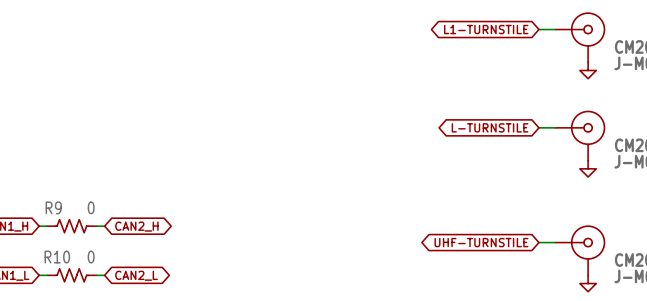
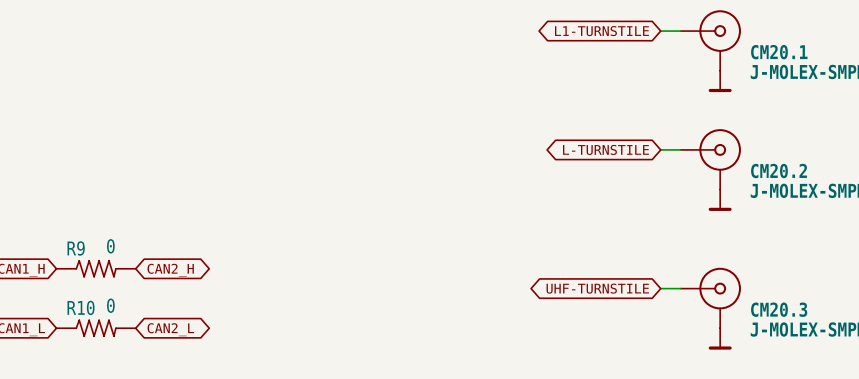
power symbol shape: [579, 62, 597, 79] -> [708, 70, 732, 93]
power symbol shape: [579, 160, 597, 178] -> [708, 189, 732, 211]
R9 symbol: [47, 219, 97, 233] -> [56, 260, 136, 278]
R10 symbol: [47, 268, 97, 282] -> [56, 319, 136, 337]
power symbol shape: [579, 275, 597, 292] -> [708, 328, 732, 350]

